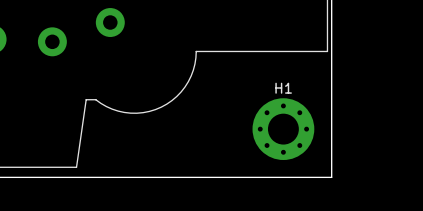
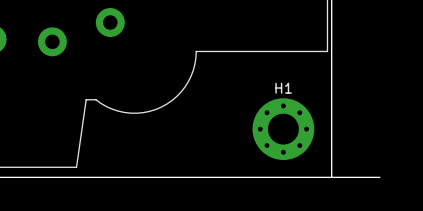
board edge: none -> (331, 177) (379, 177)

